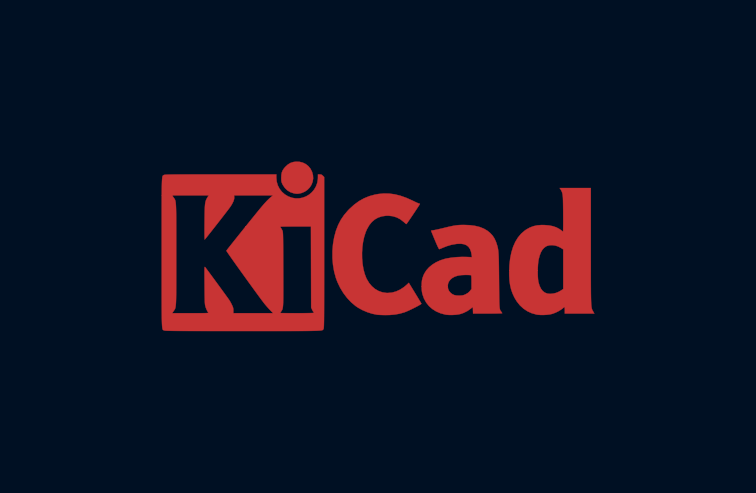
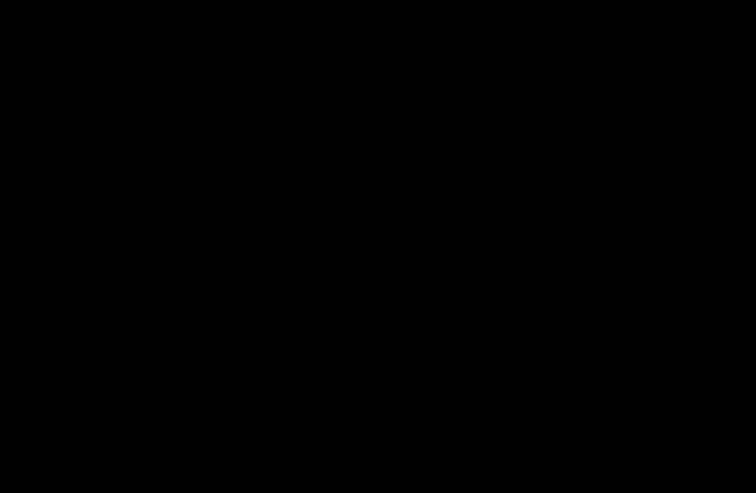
drawing: [161, 161, 595, 332] -> none

